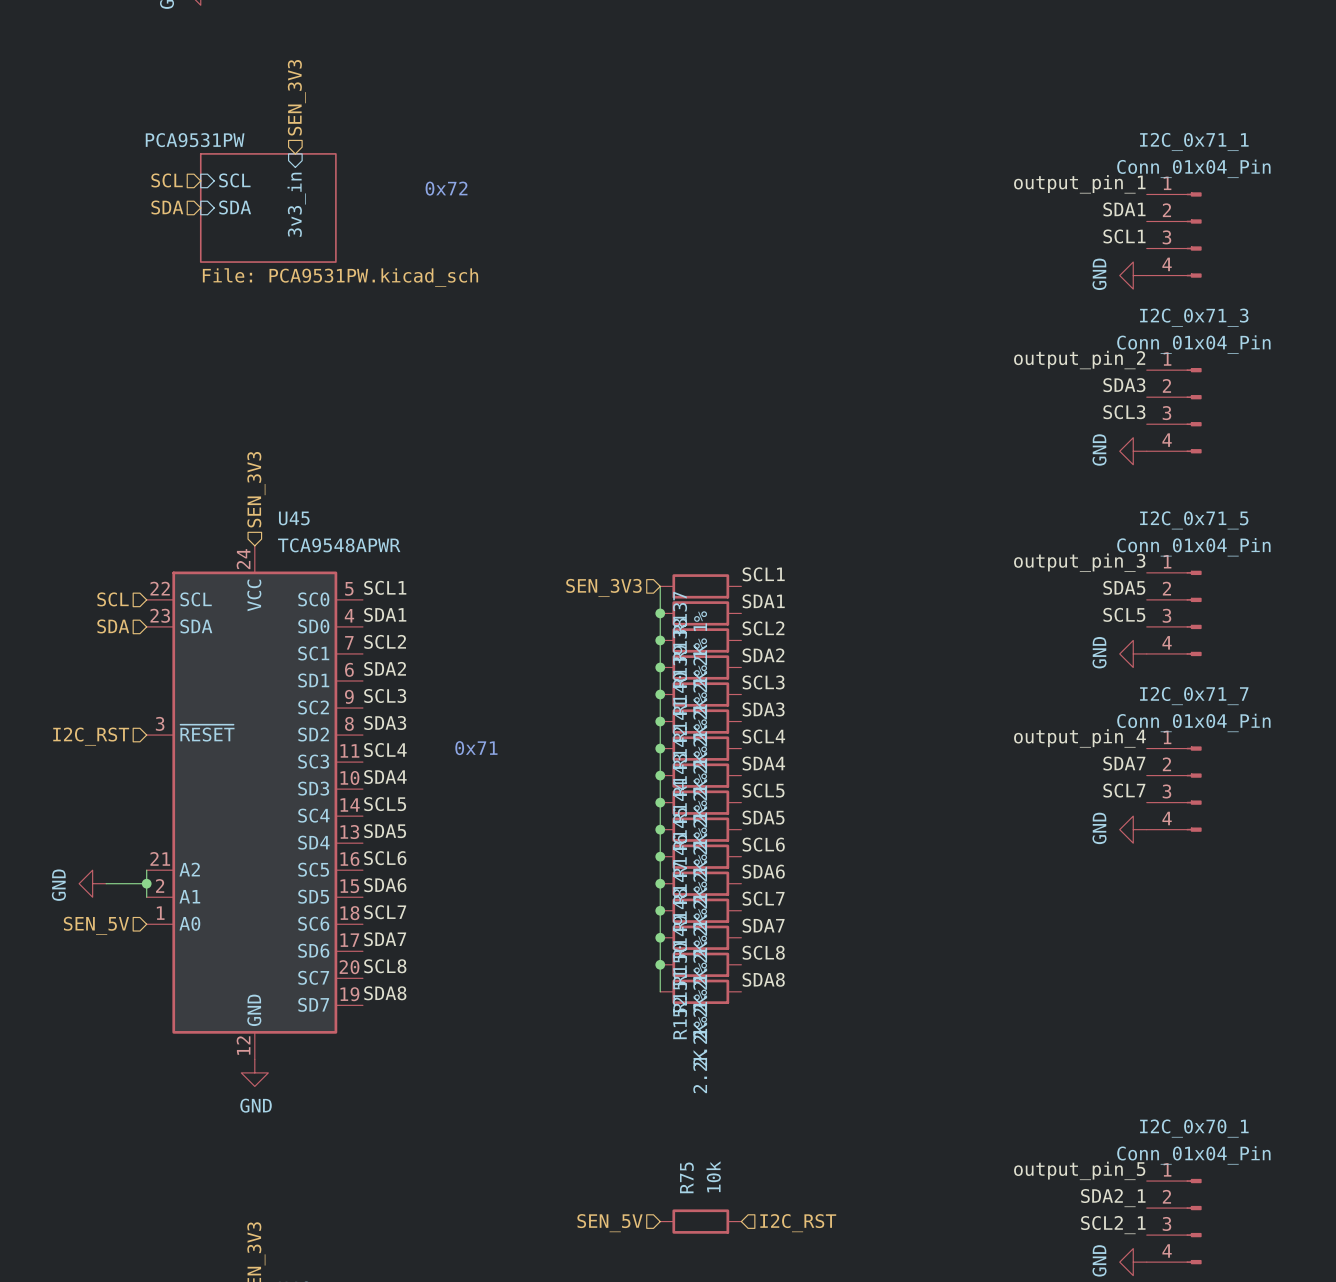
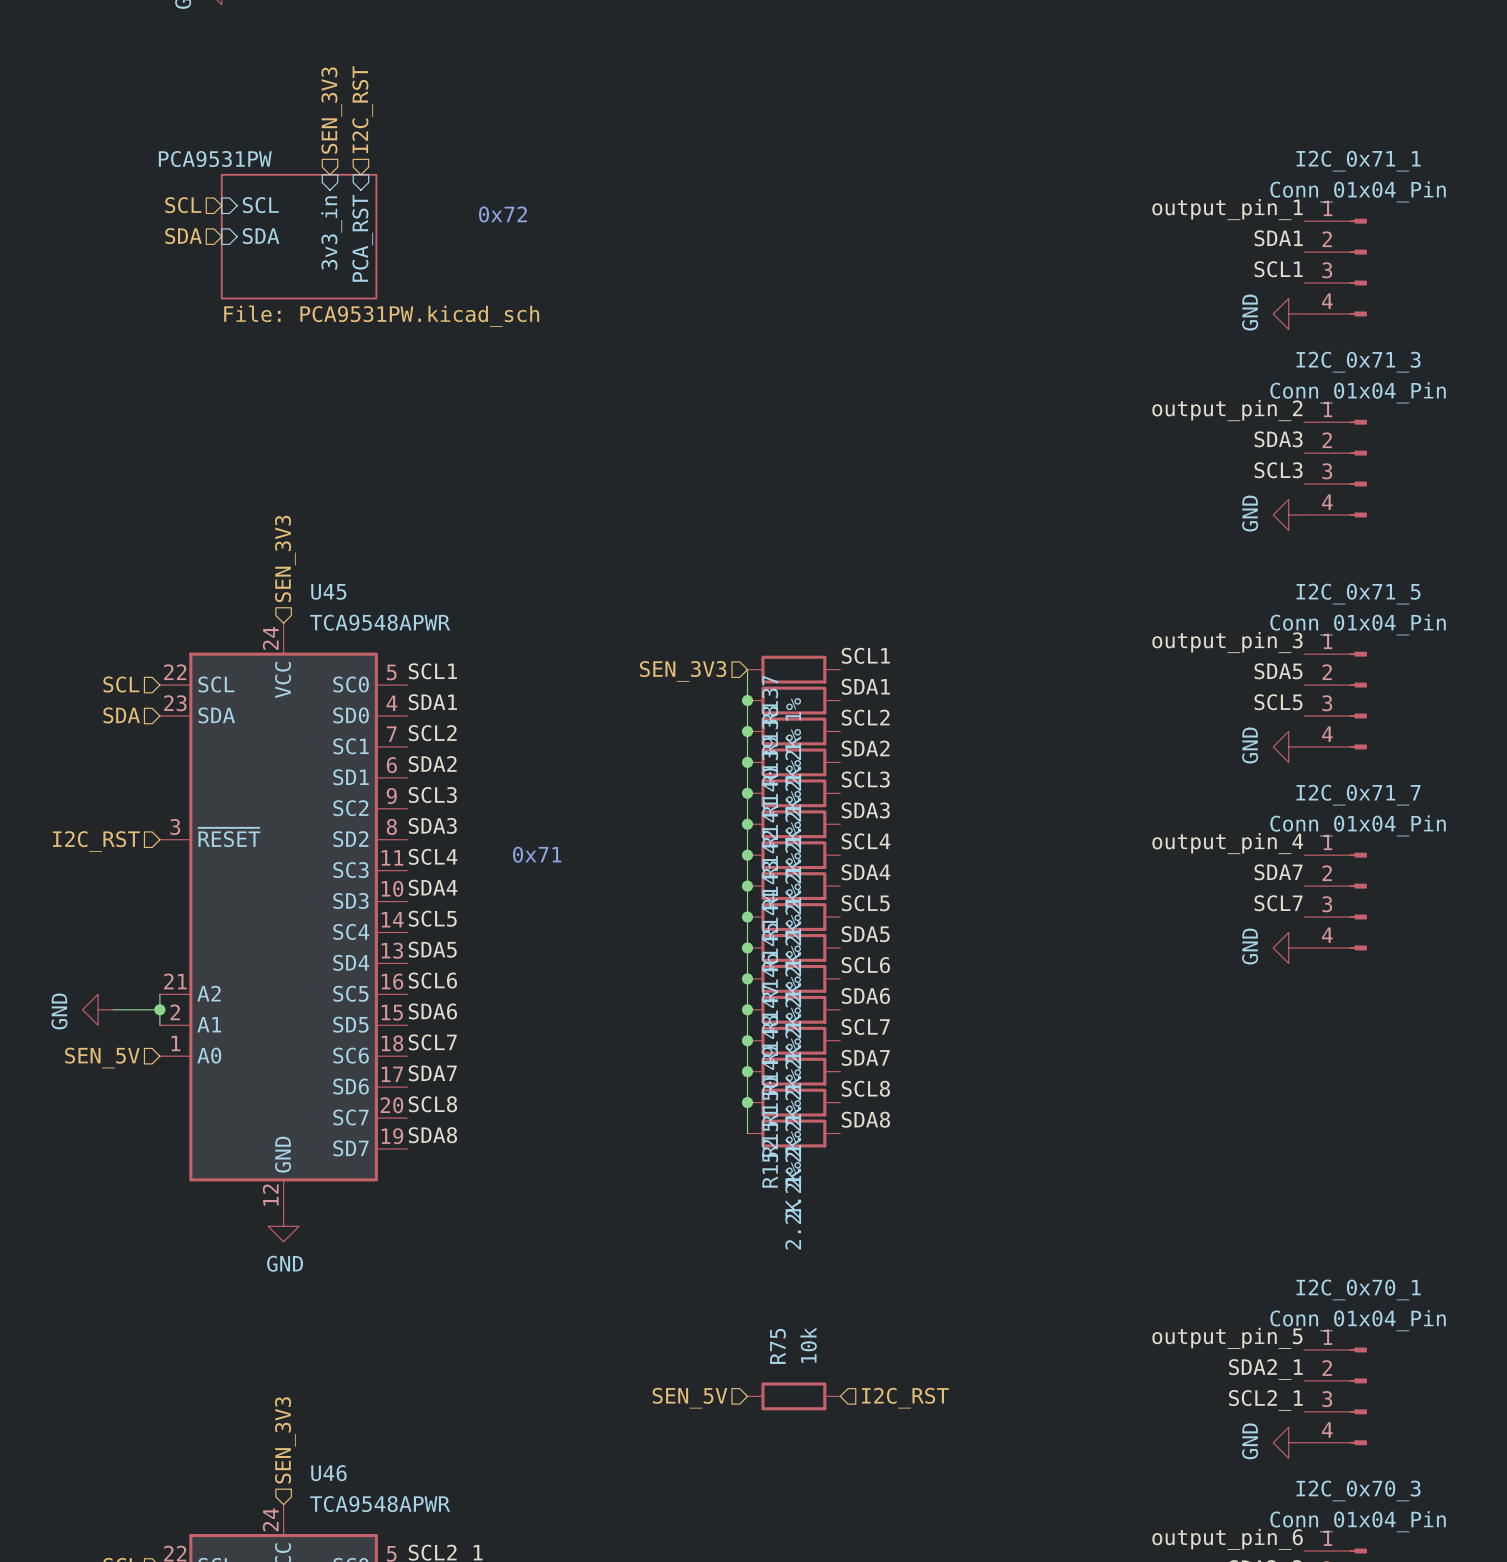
hierarchical label: none -> I2C_RST (362, 109)
sheet pin: none -> PCA_RST (362, 238)

